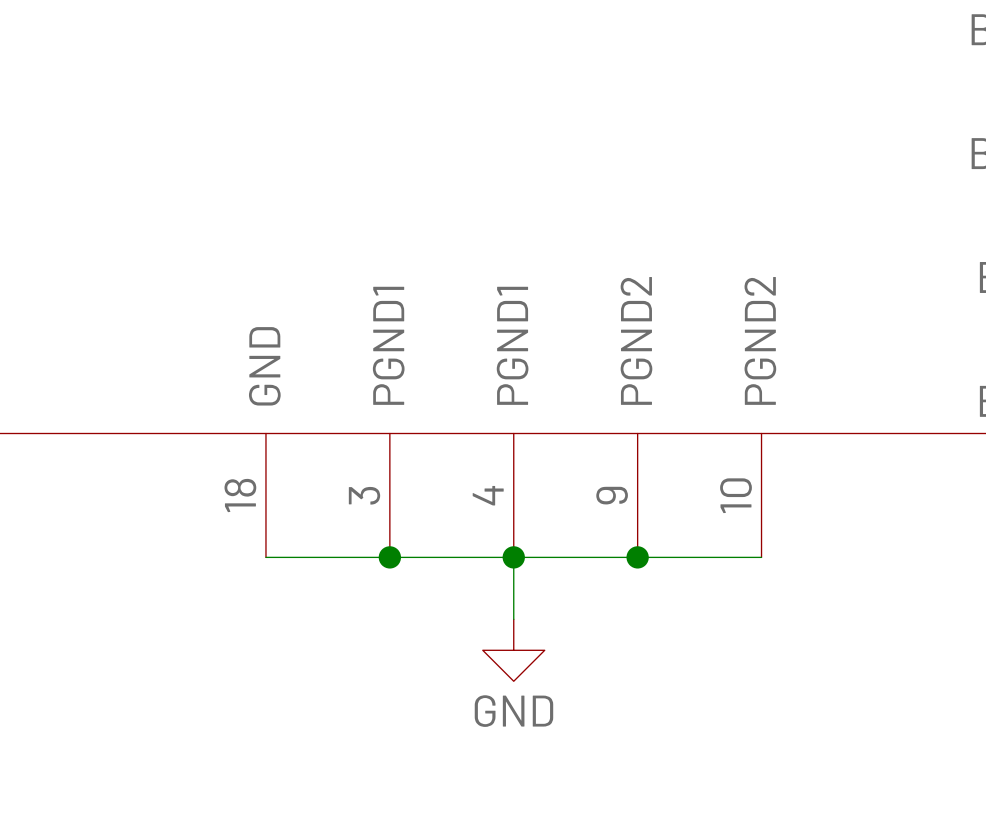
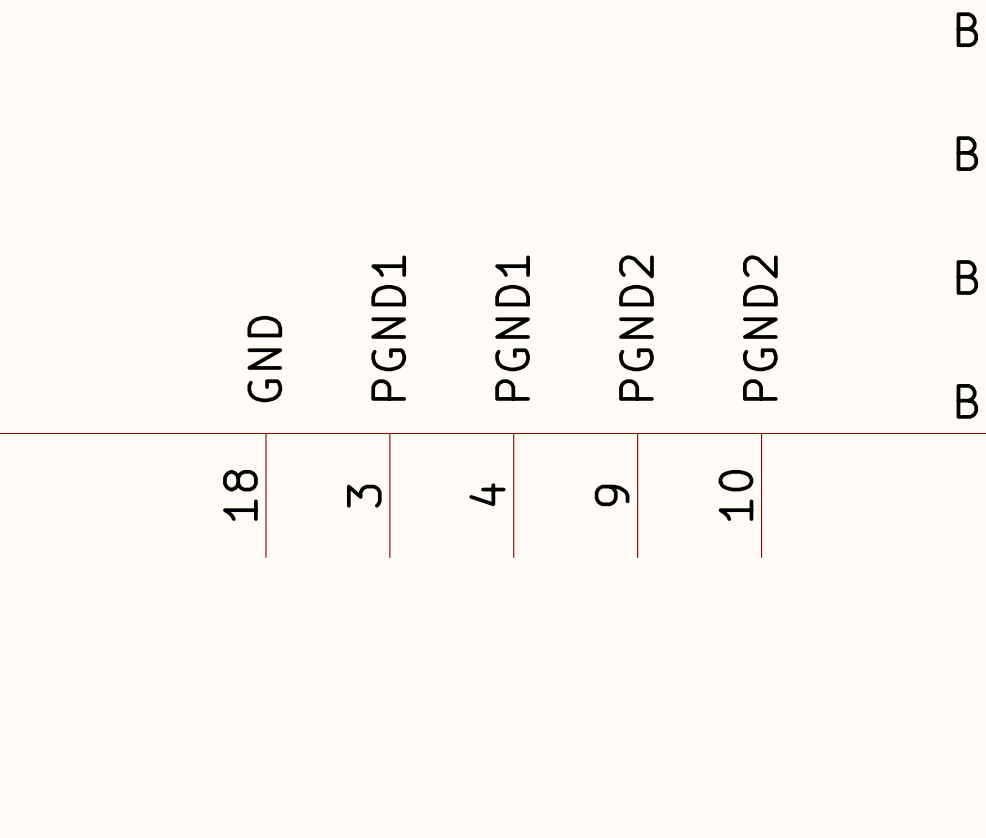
wire: (265, 557) (761, 557) -> none
junction: (389, 557) -> none
wire: (513, 557) (513, 619) -> none
junction: (513, 557) -> none
junction: (637, 557) -> none
power symbol: GND (513, 650) -> none

